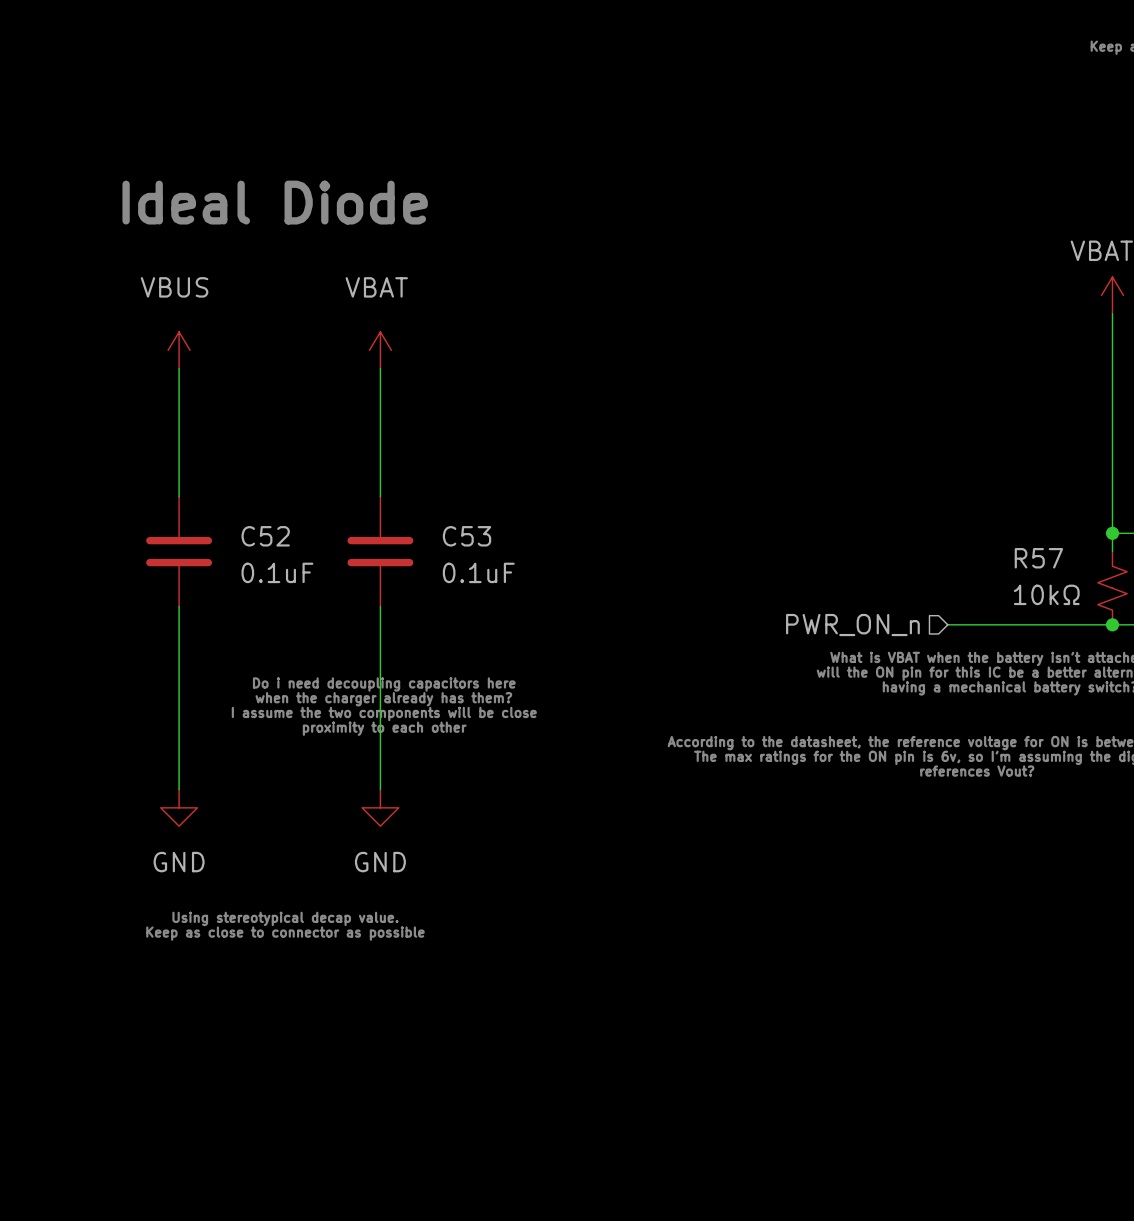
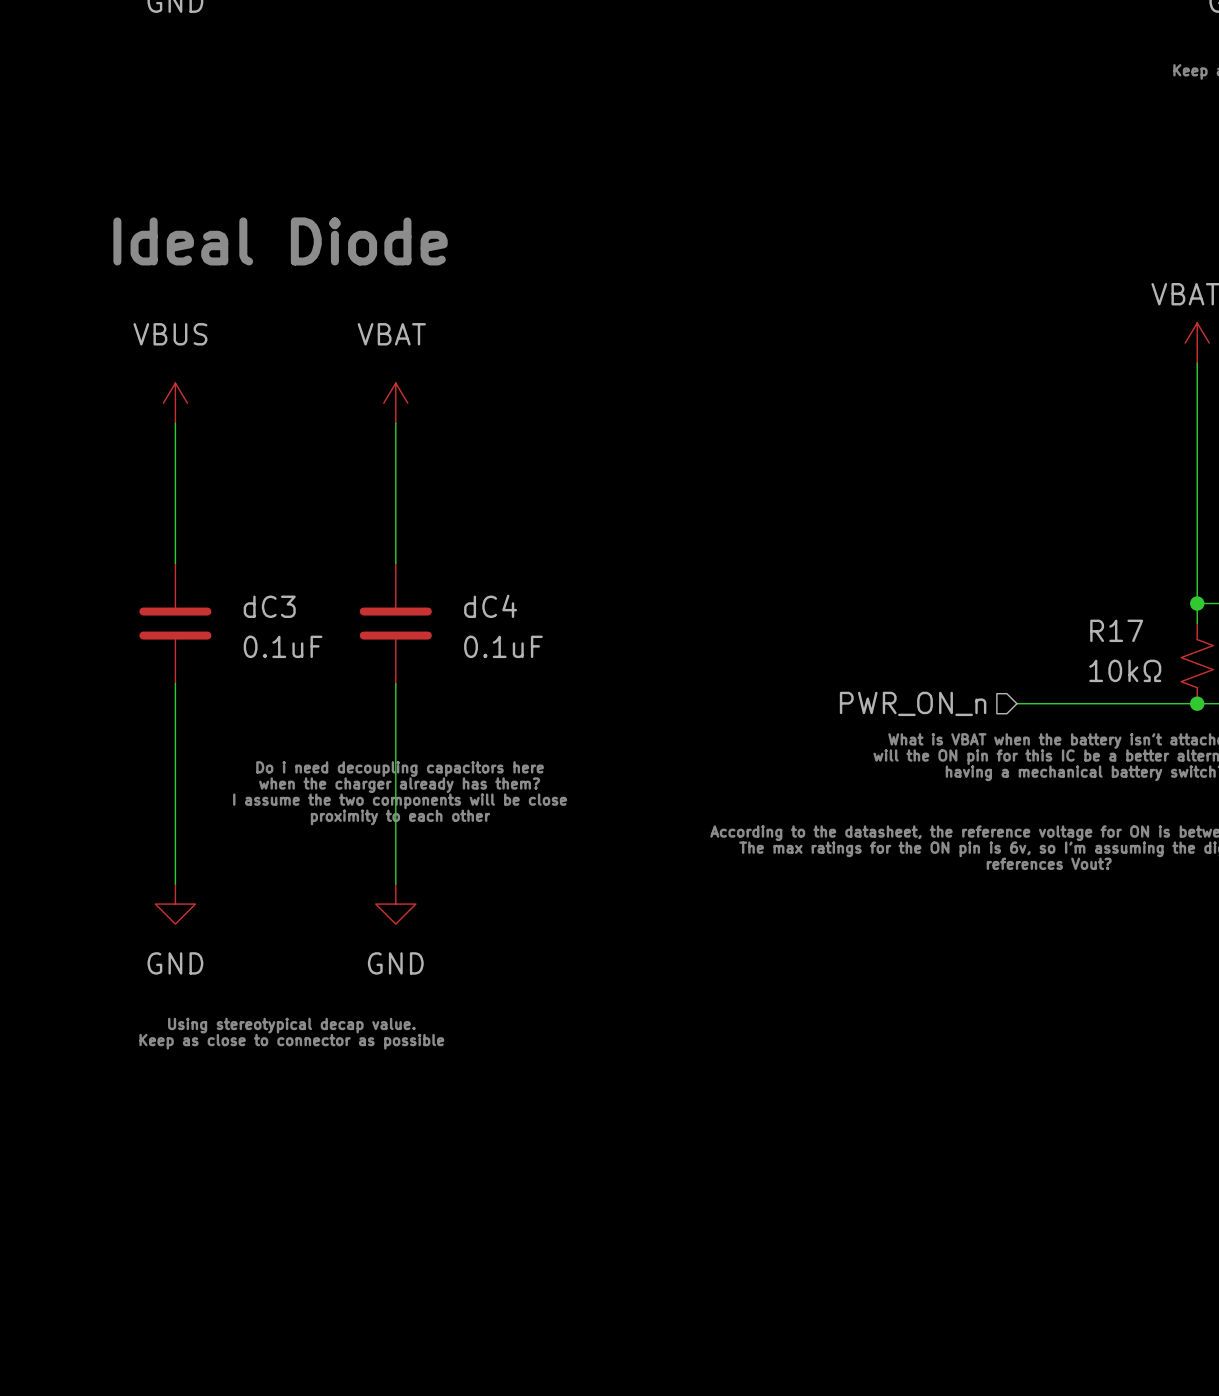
C52 name: C52 (265, 536) -> dC3 (269, 606)
C53 name: C53 (467, 536) -> dC4 (490, 606)
R57 name: R57 (1038, 558) -> R17 (1116, 630)

